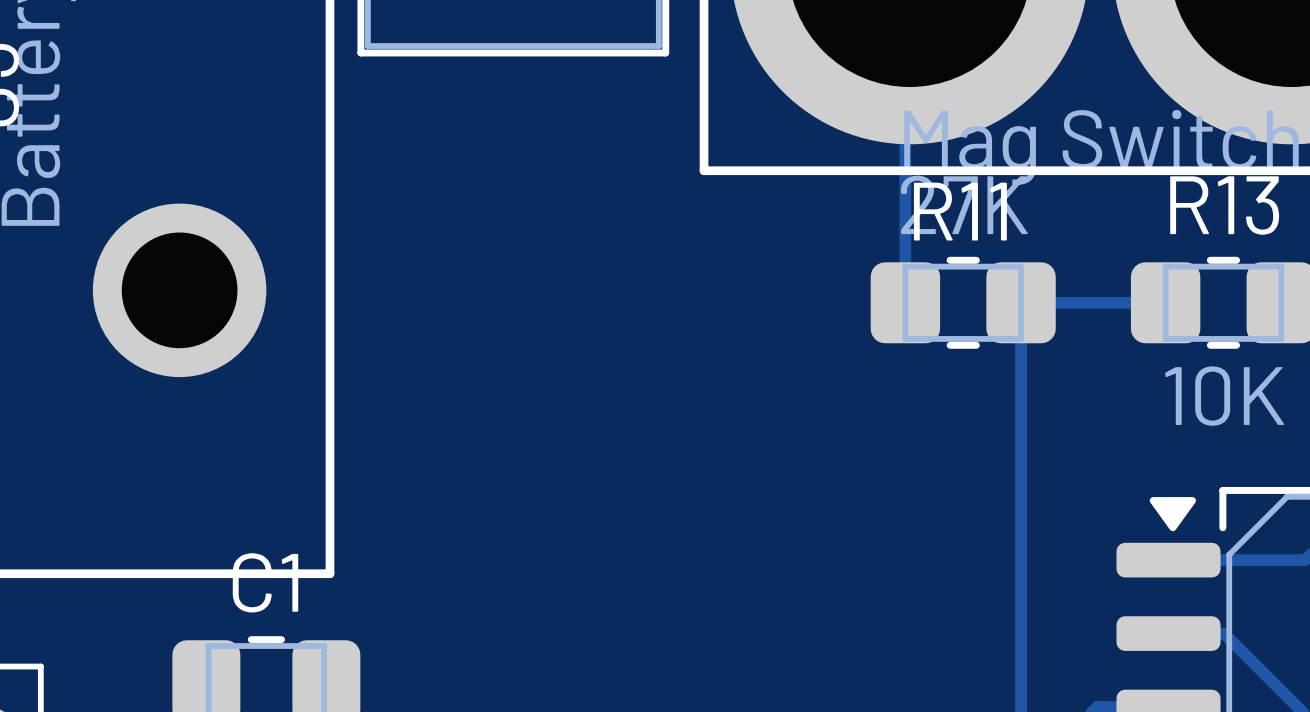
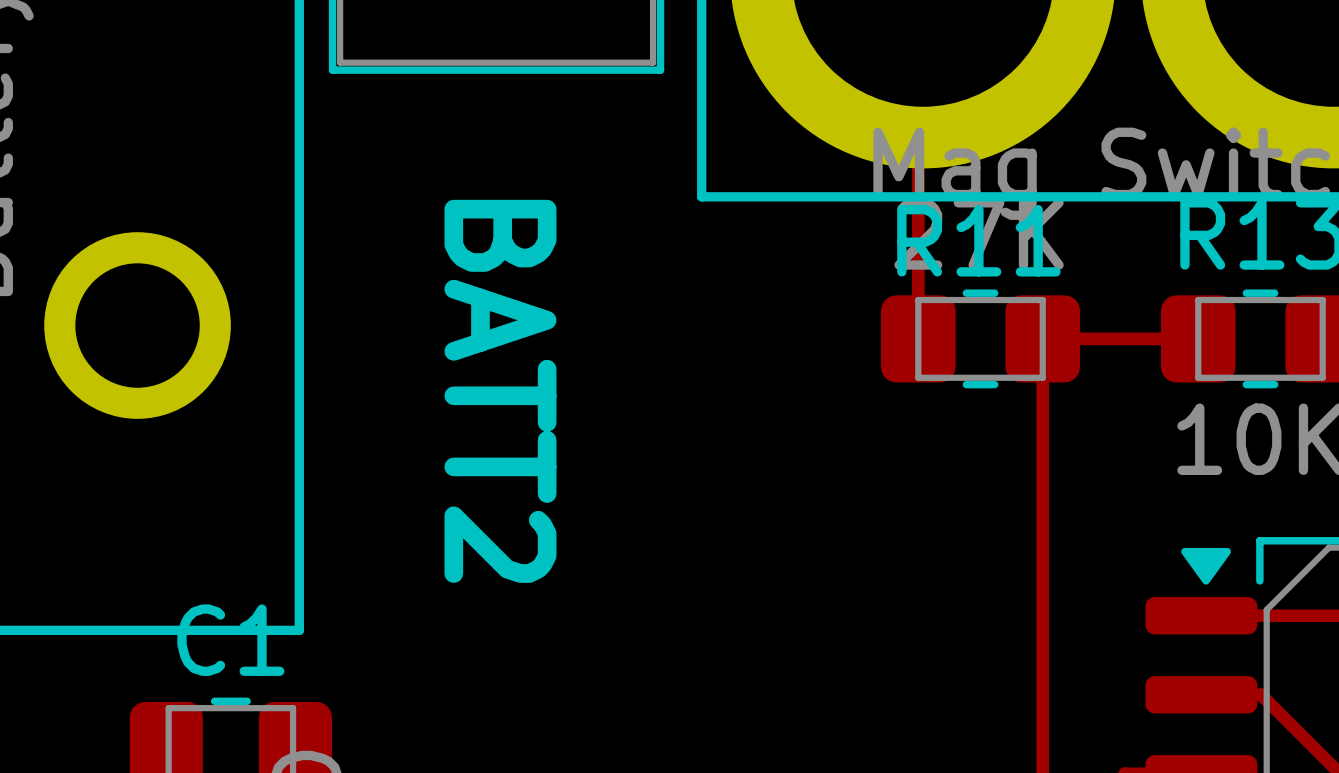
text: none -> BATT2 (500, 391)

